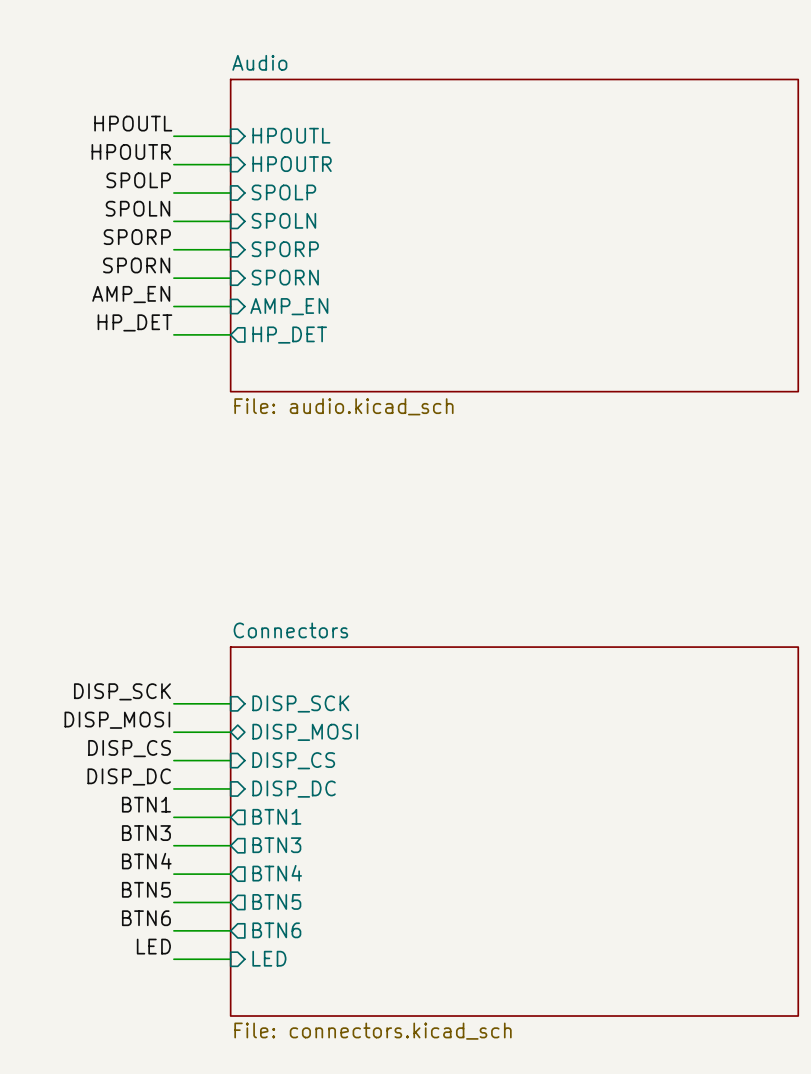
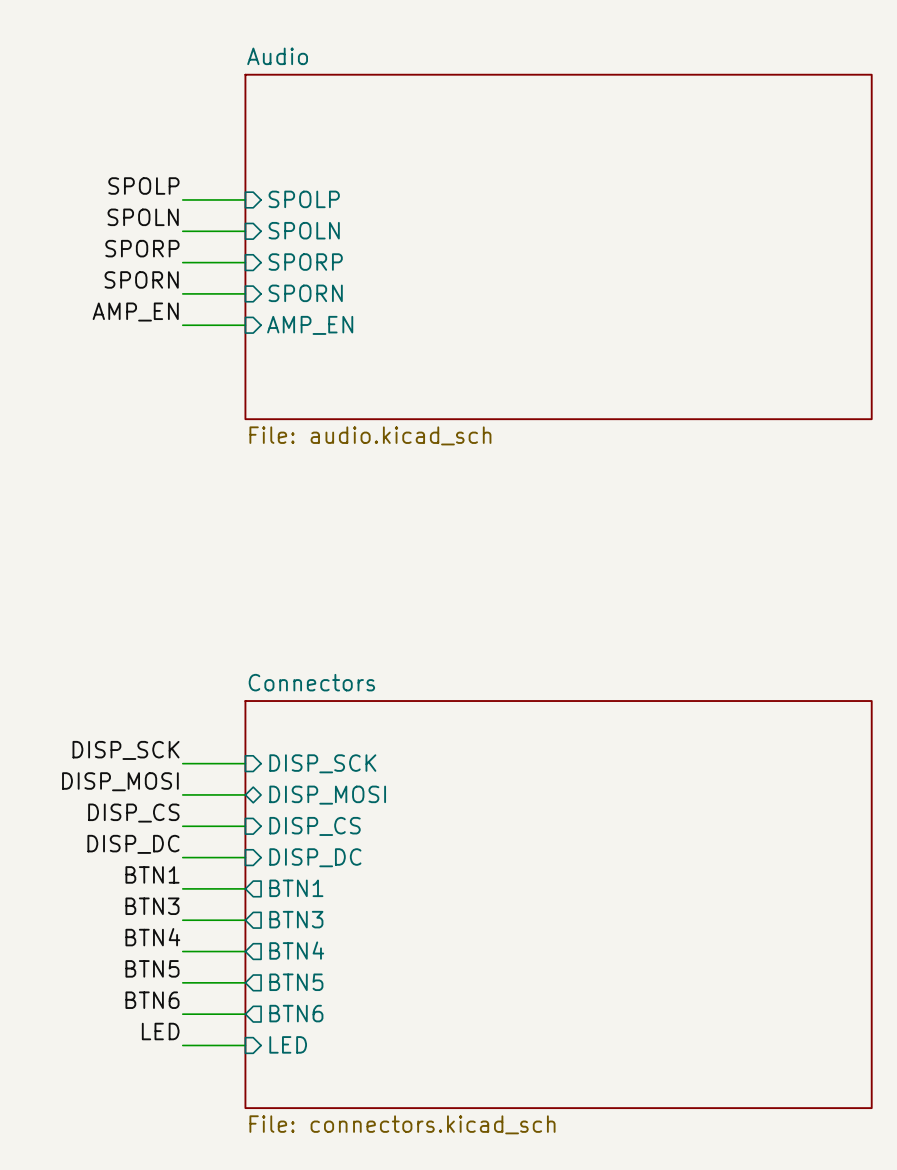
label: HPOUTL (133, 123) -> none
sheet pin: HPOUTL (291, 135) -> none
wire: (173, 136) (230, 136) -> none
label: HPOUTR (131, 151) -> none
wire: (173, 164) (230, 164) -> none
sheet pin: HPOUTR (292, 164) -> none
label: HP_DET (134, 322) -> none
wire: (173, 334) (230, 334) -> none
sheet pin: HP_DET (289, 335) -> none

